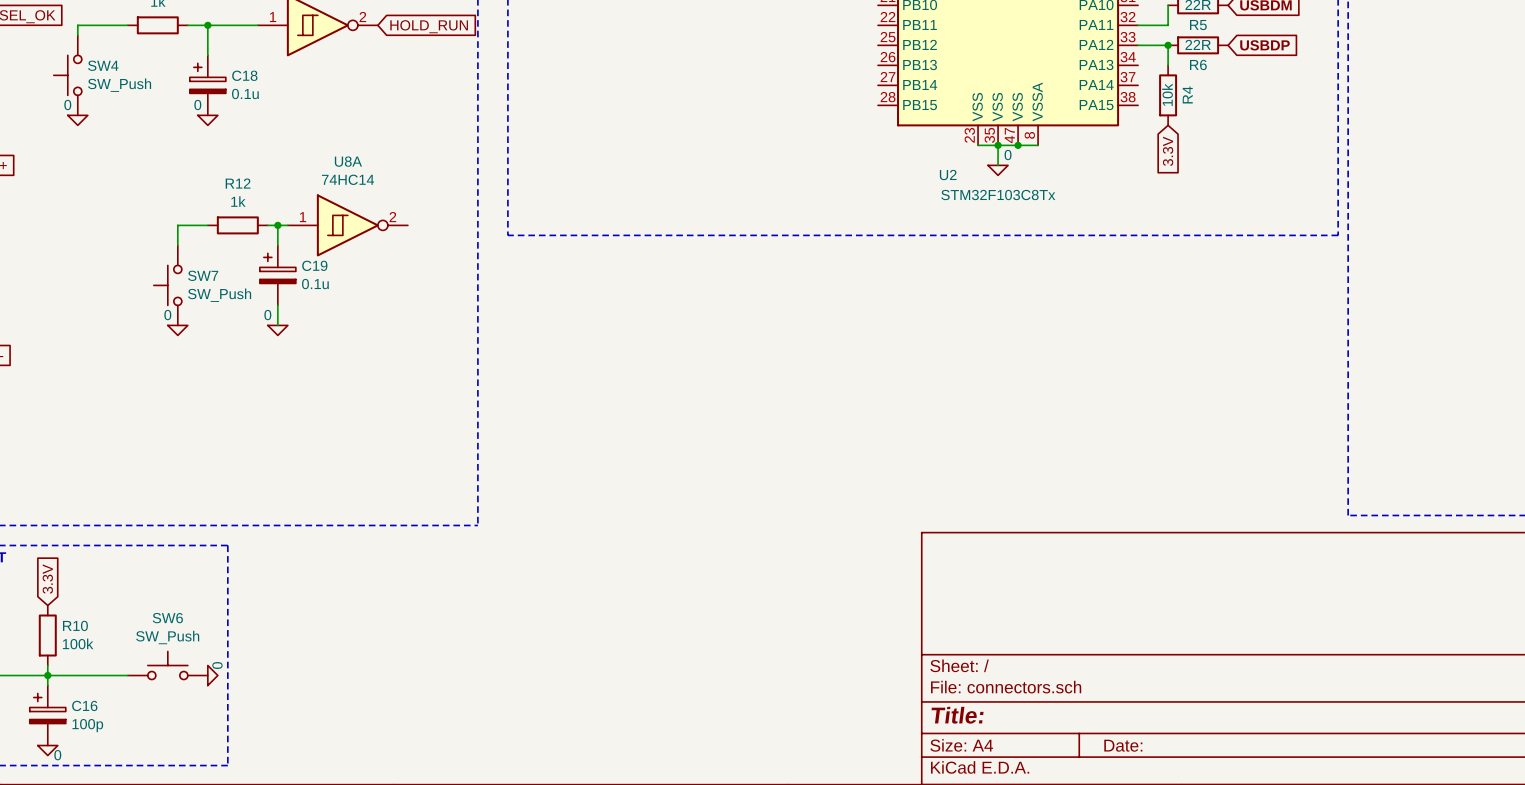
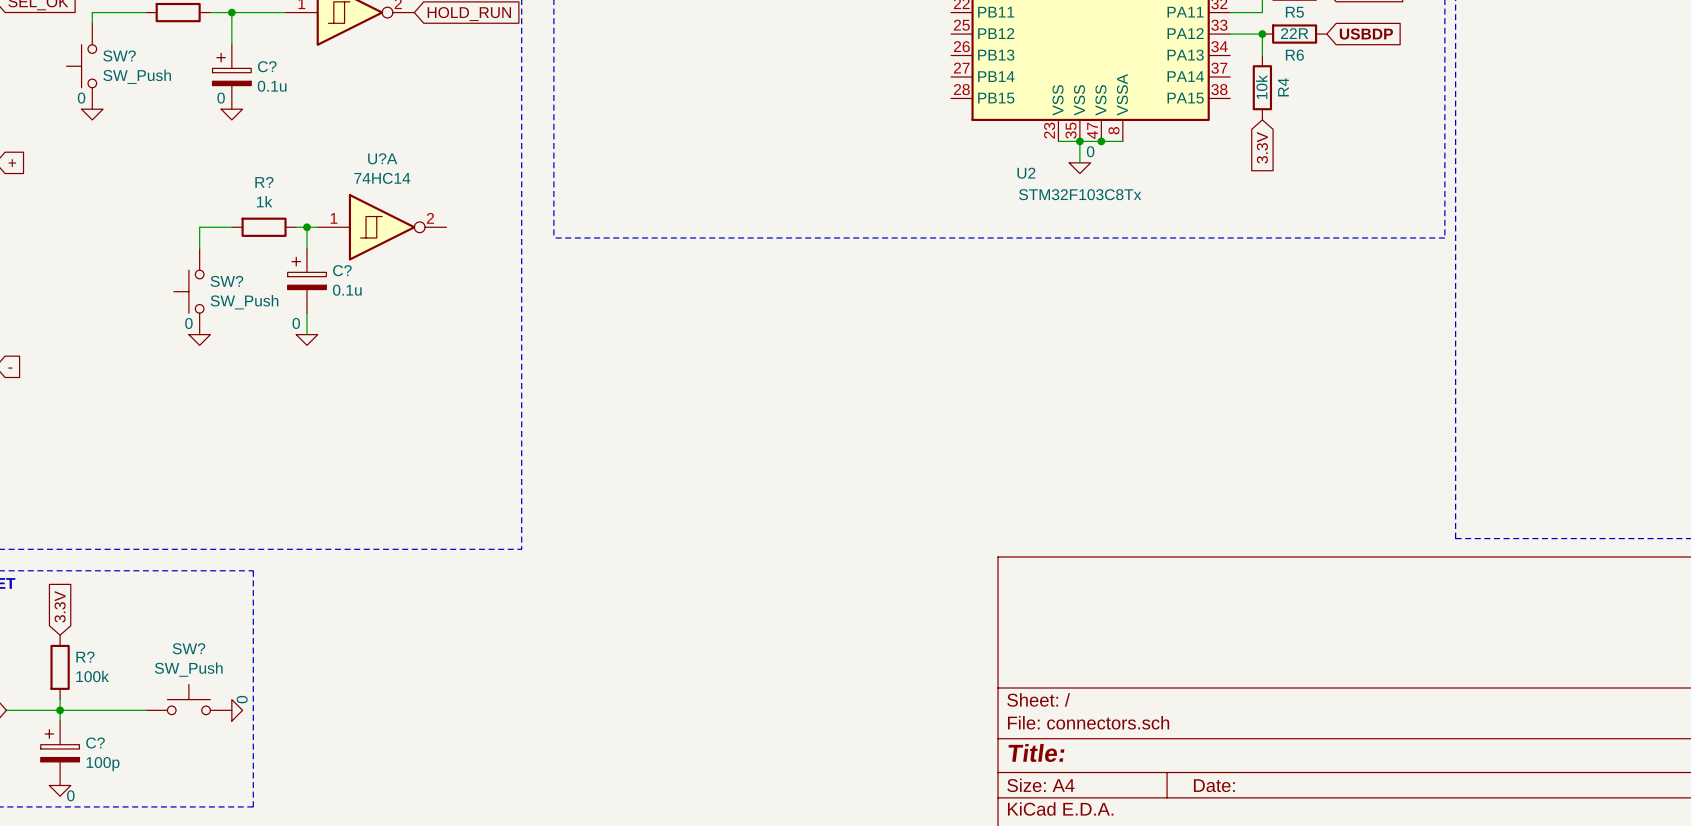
SW4 name: SW4 (103, 65) -> SW? (119, 55)
C18 name: C18 (244, 75) -> C? (267, 66)
U8A name: U8A (348, 161) -> U?A (382, 158)
R12 name: R12 (238, 183) -> R? (264, 182)
C19 name: C19 (314, 265) -> C? (342, 270)
SW7 name: SW7 (203, 275) -> SW? (226, 281)
SW6 name: SW6 (167, 618) -> SW? (188, 648)
R10 name: R10 (75, 625) -> R? (85, 657)
C16 name: C16 (84, 705) -> C? (95, 742)

